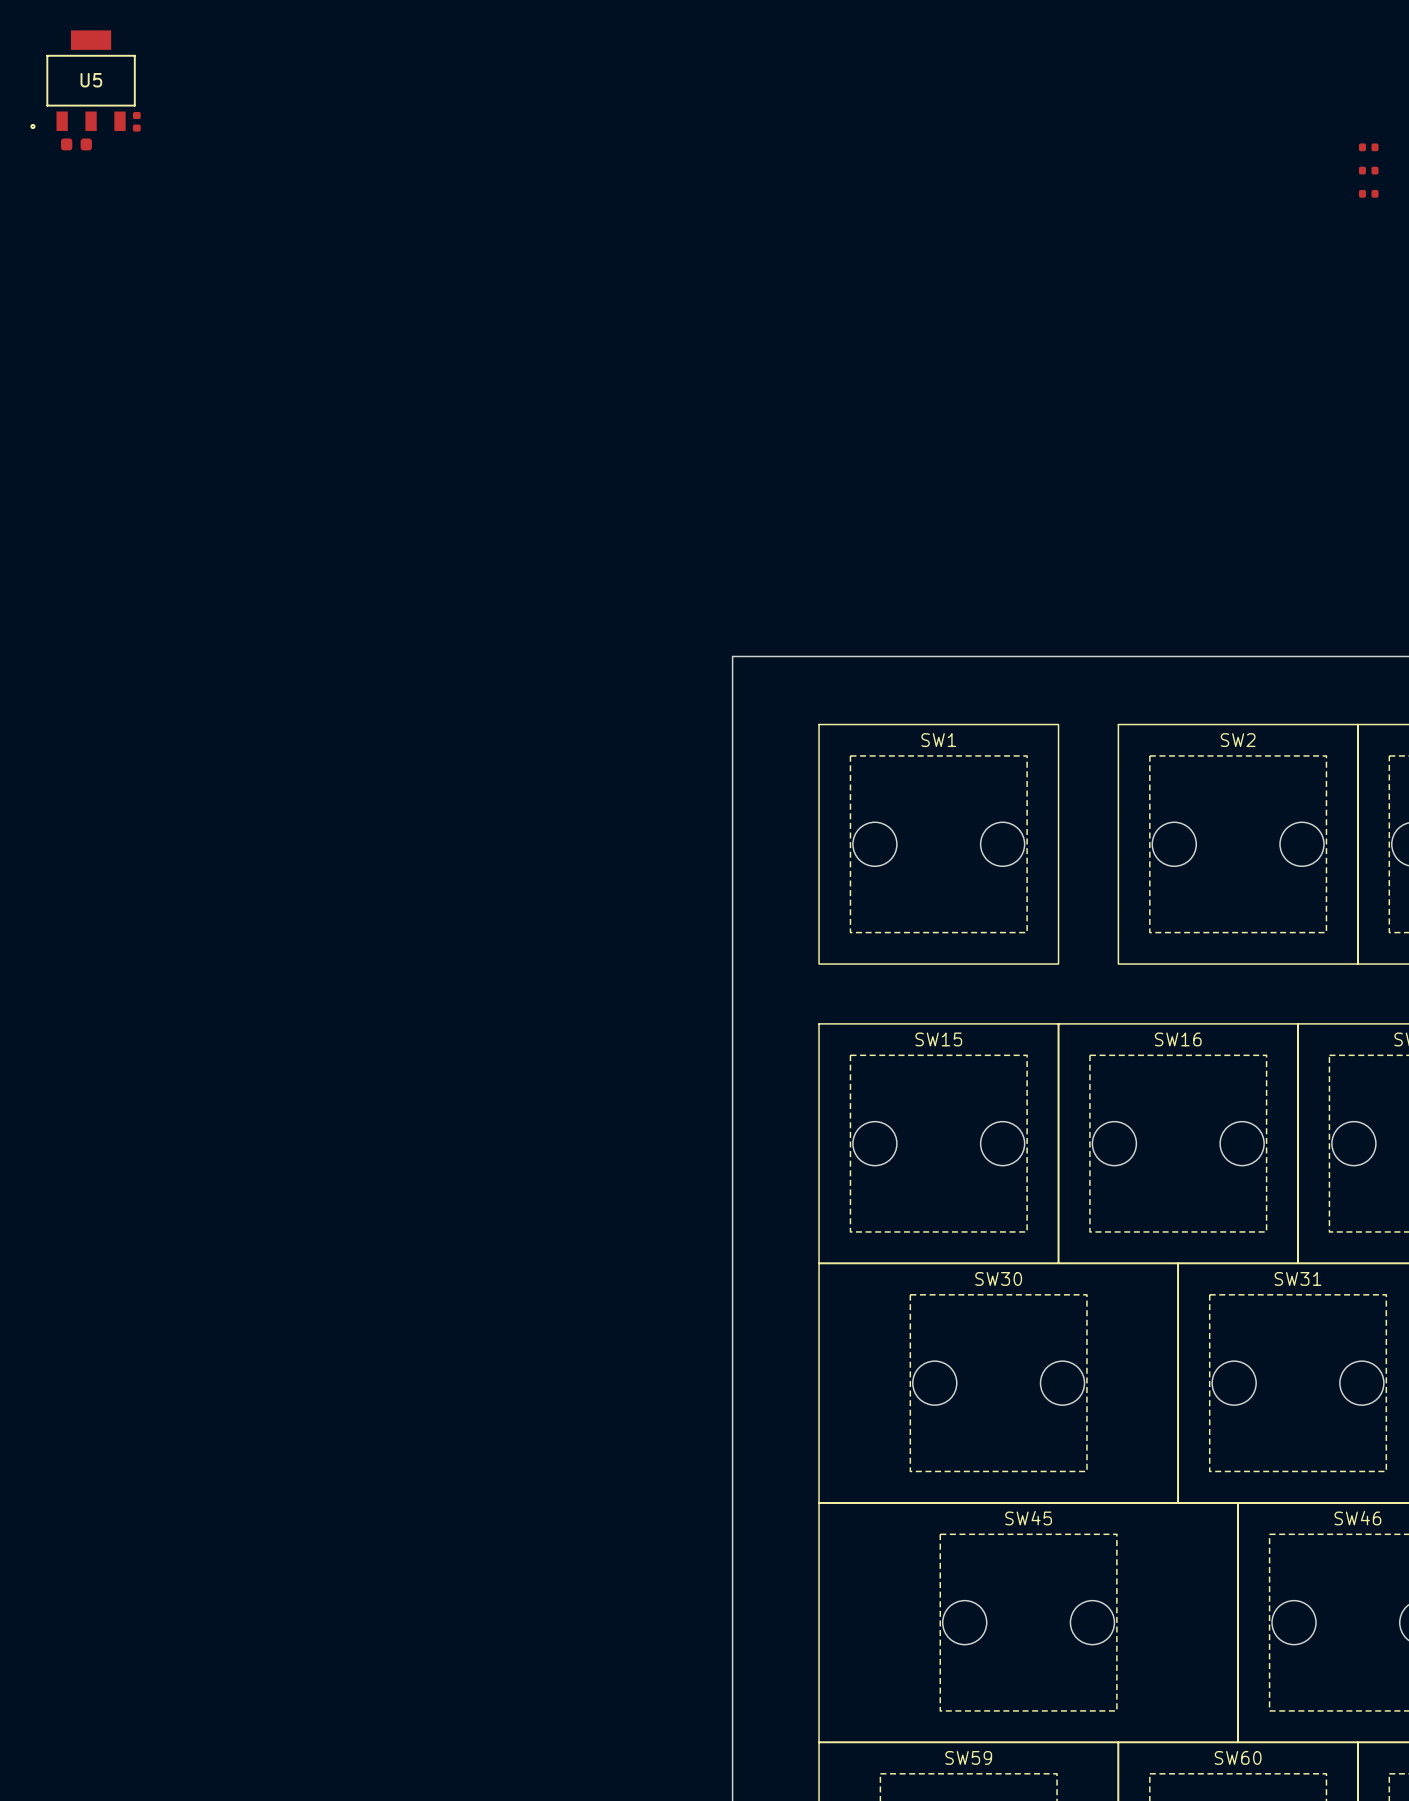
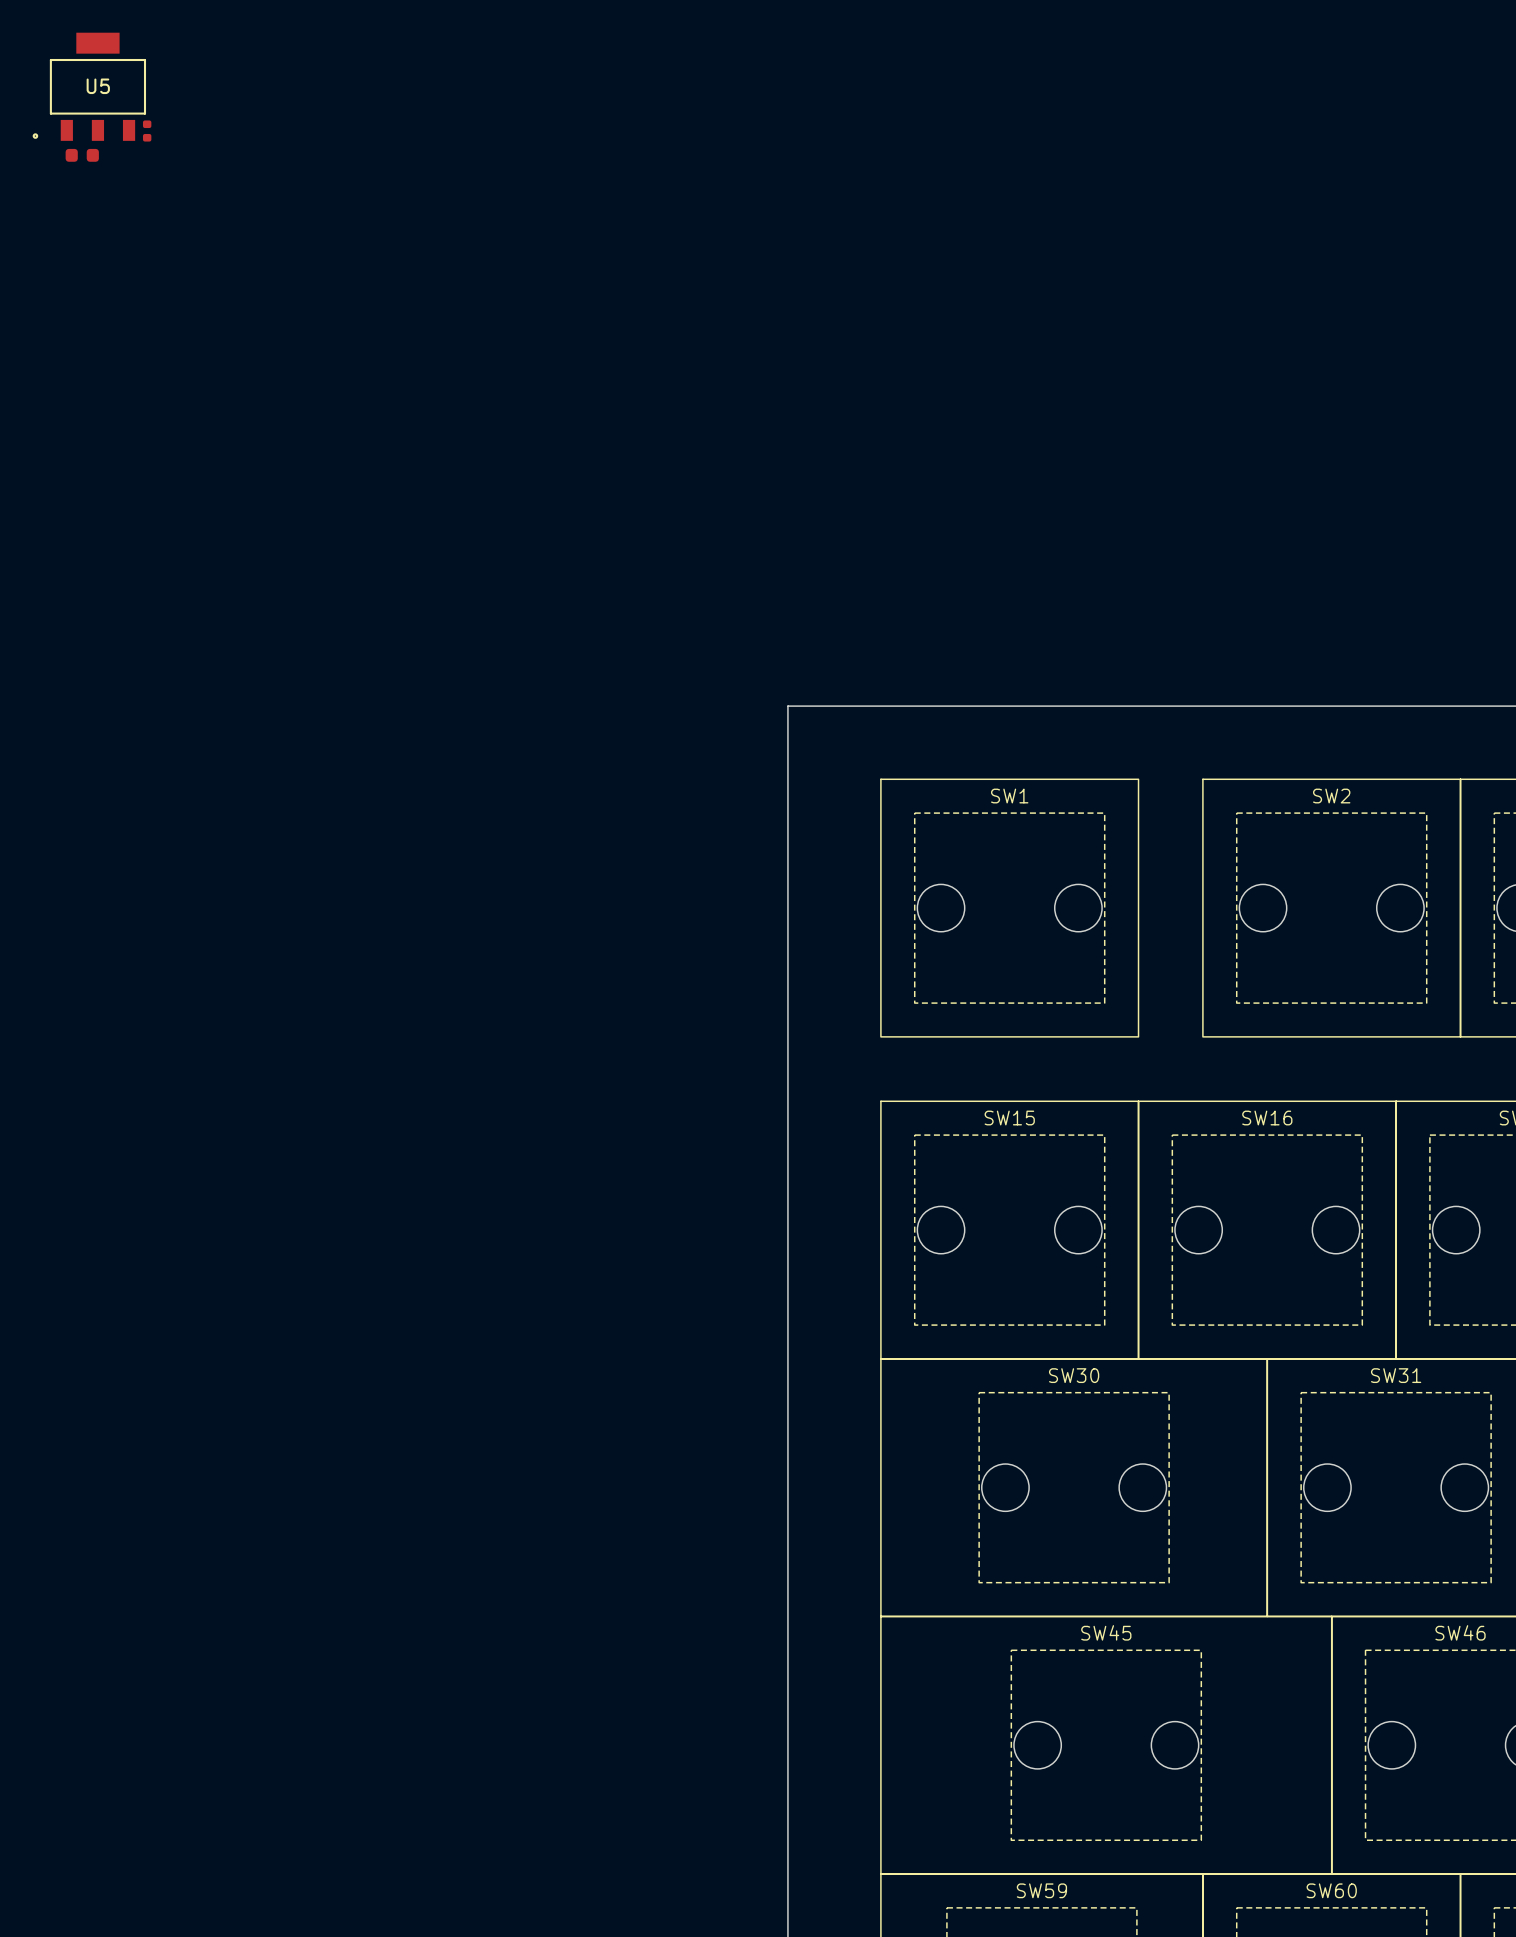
part: (1368, 147) -> none
part: (1368, 170) -> none
part: (1368, 193) -> none

